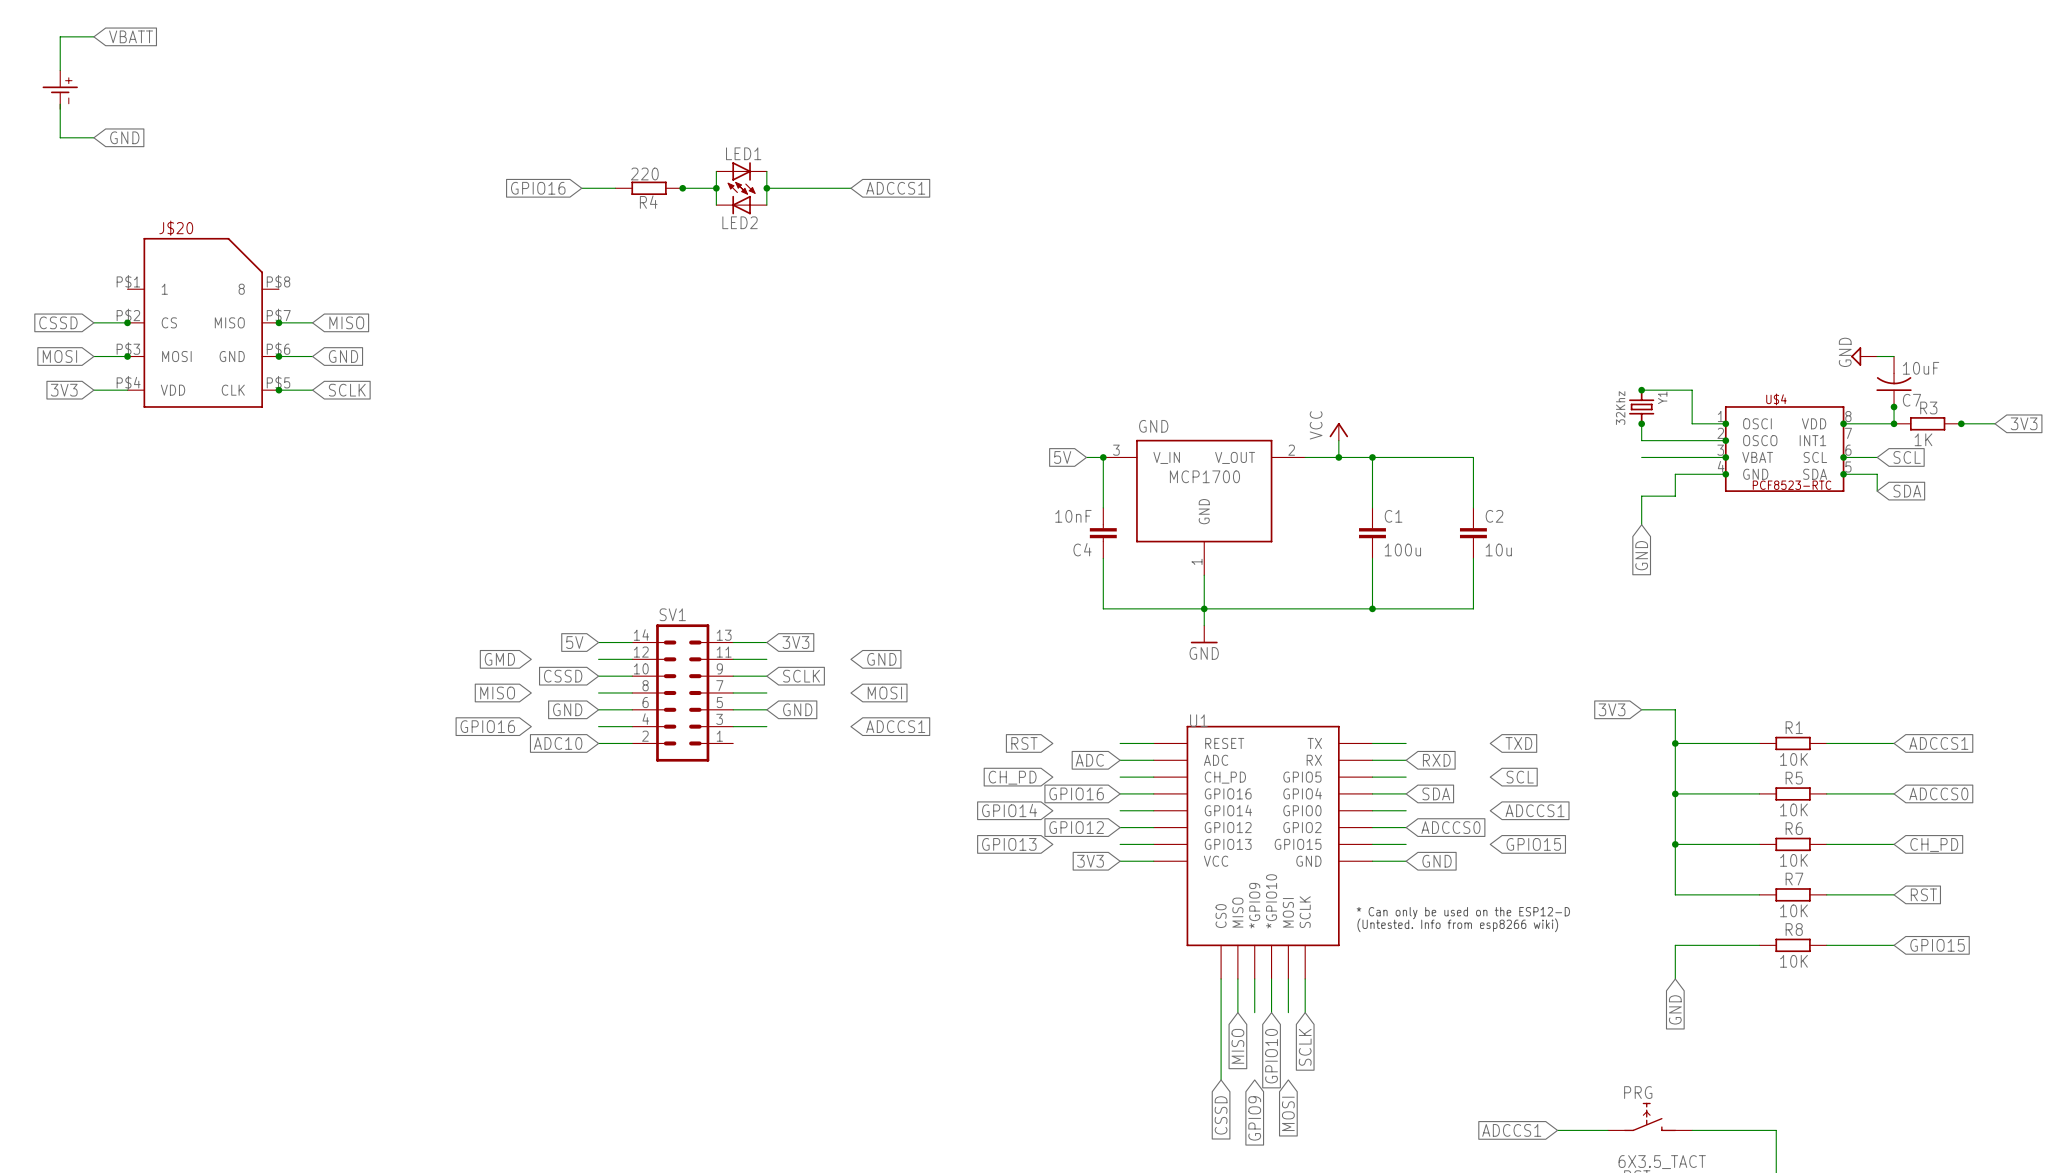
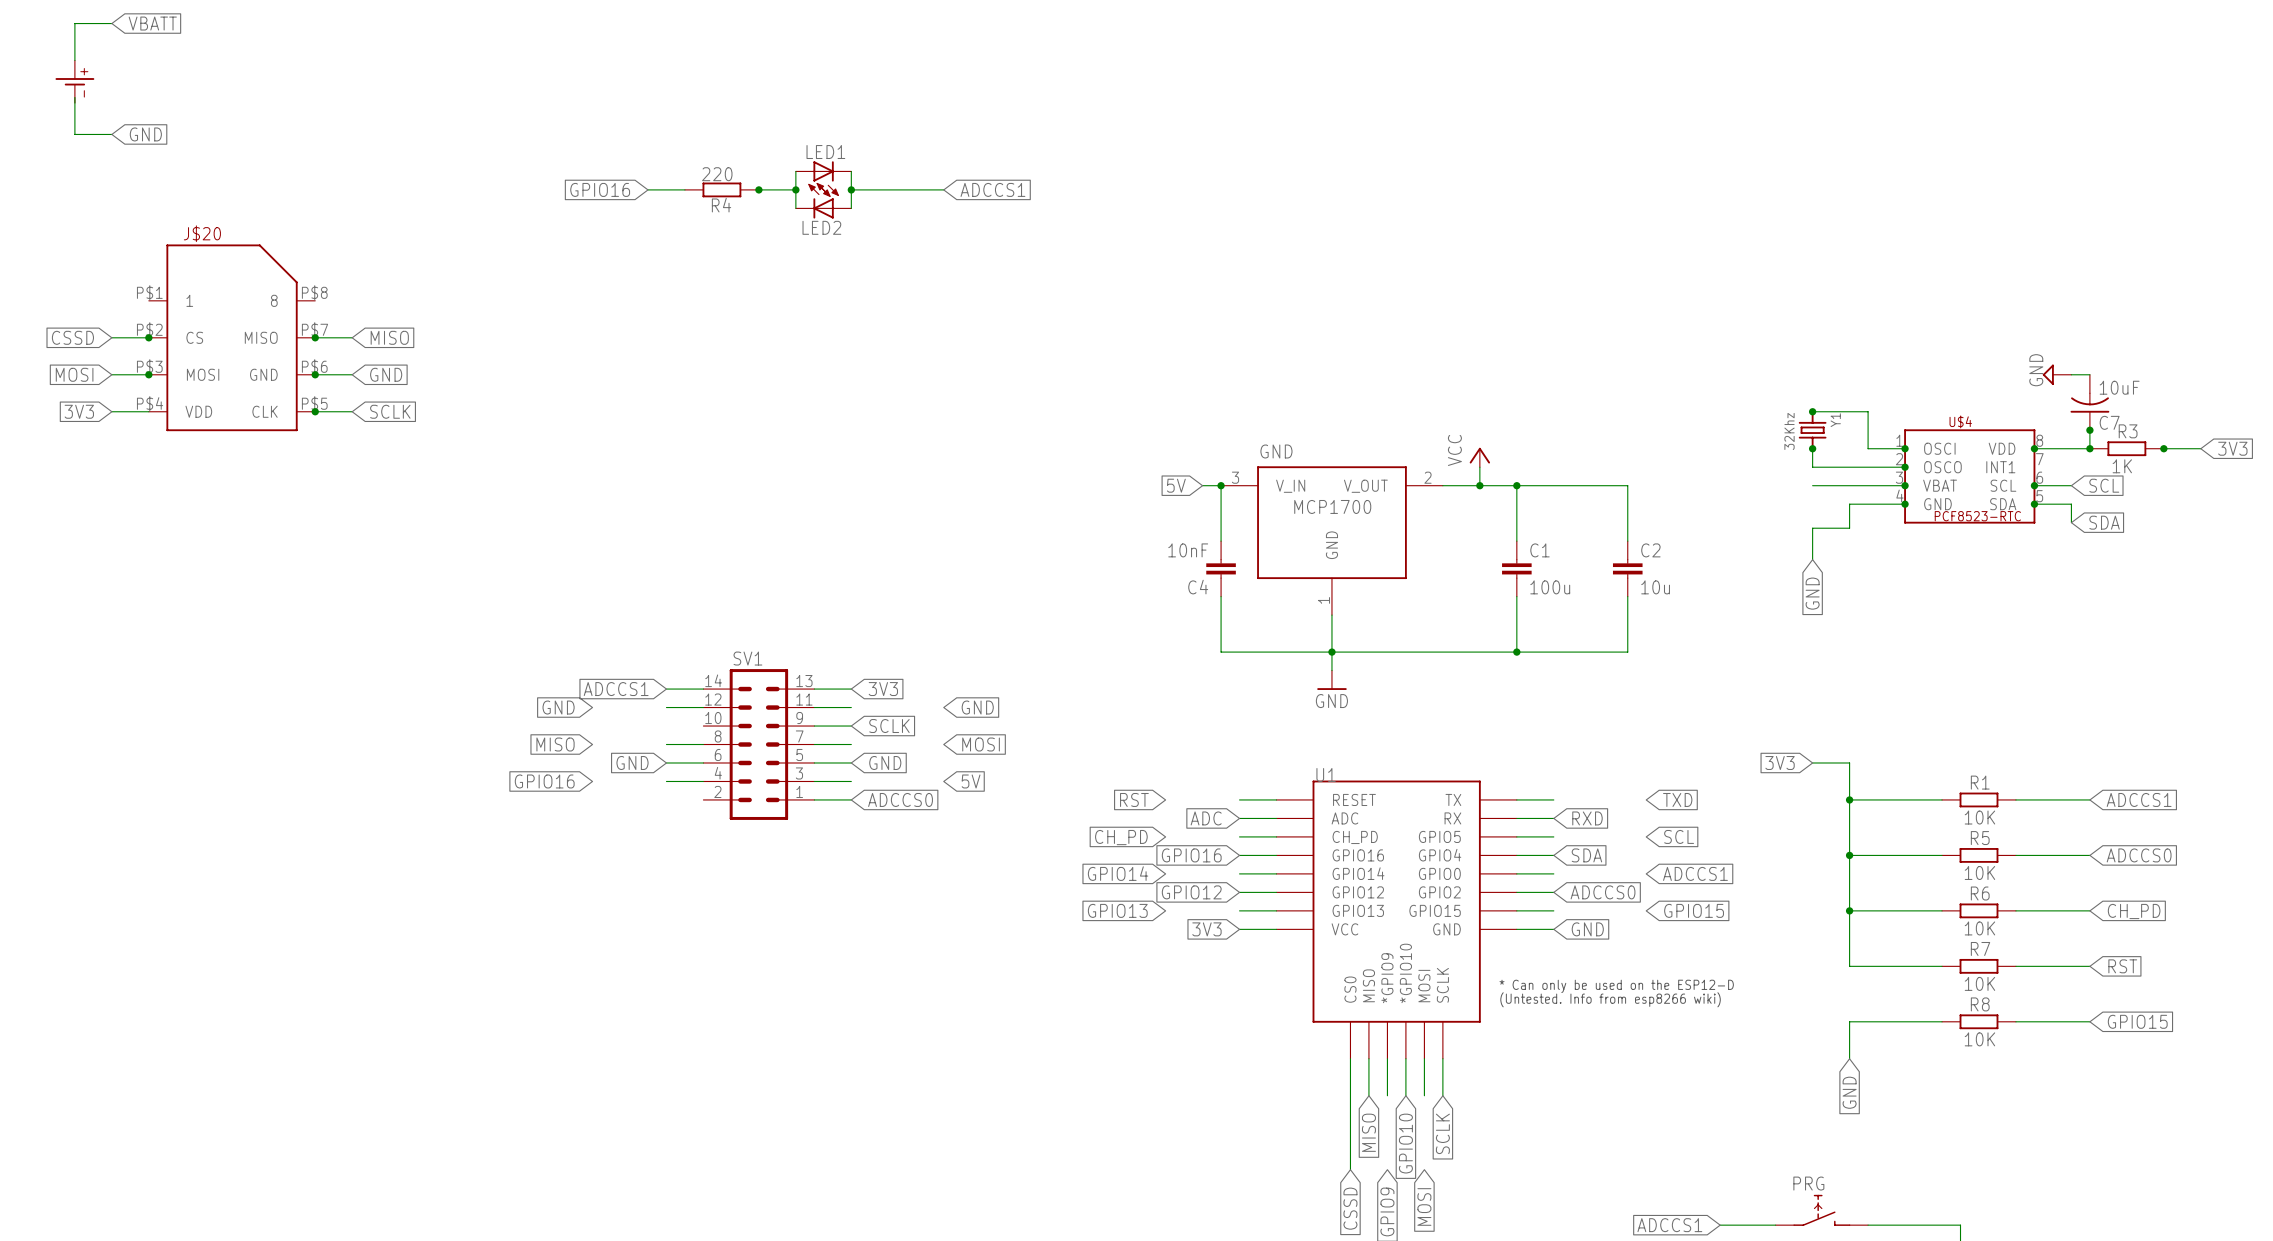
global label: 5V (574, 642) -> ADCCS1 (616, 689)
global label: GMD (499, 659) -> GND (558, 707)
global label: CSSD (563, 676) -> none
wire: (598, 676) (632, 676) -> none
global label: ADCCS1 (895, 726) -> 5V (971, 781)
global label: ADC10 (558, 743) -> none
wire: (598, 743) (632, 743) -> (814, 799) (851, 799)
global label: none -> ADCCS0 (900, 799)

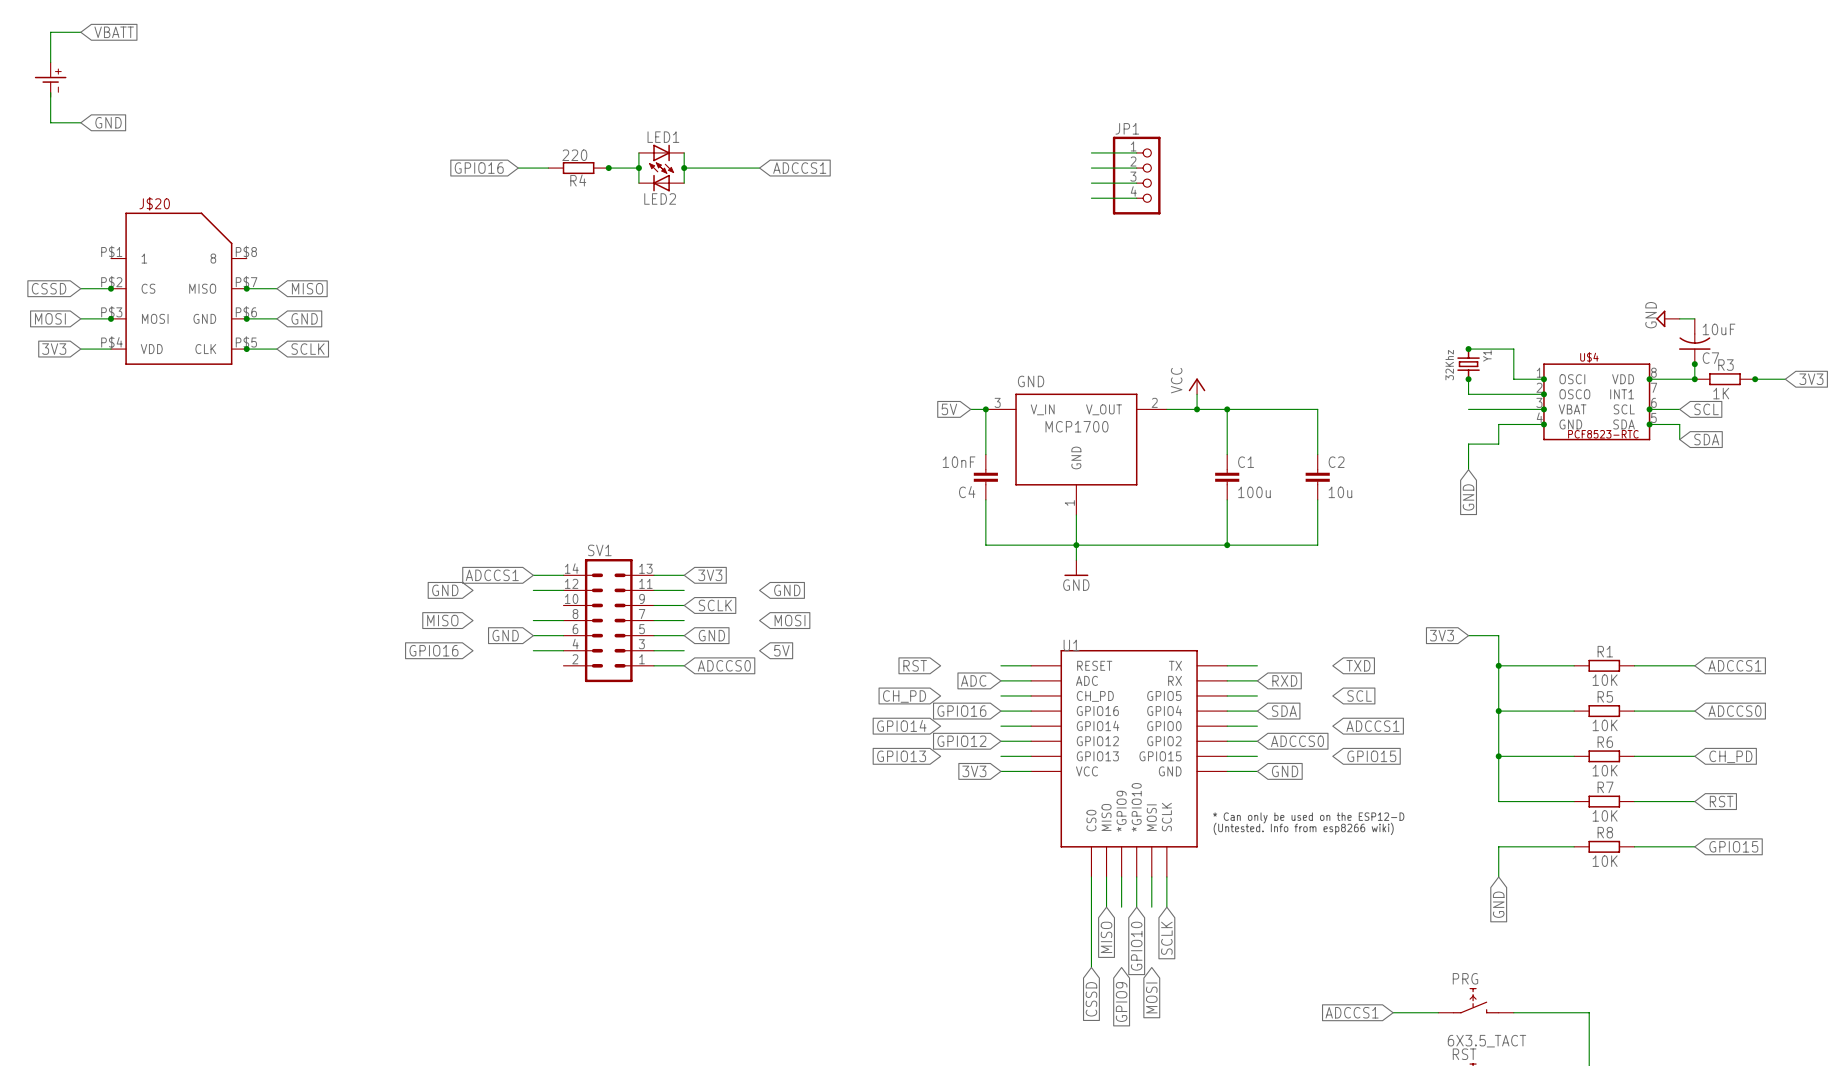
wire: none -> (1091, 152) (1136, 152)
wire: none -> (1091, 168) (1136, 168)
JP1: none -> (1136, 175)
wire: none -> (1091, 183) (1136, 183)
wire: none -> (1091, 198) (1136, 198)

